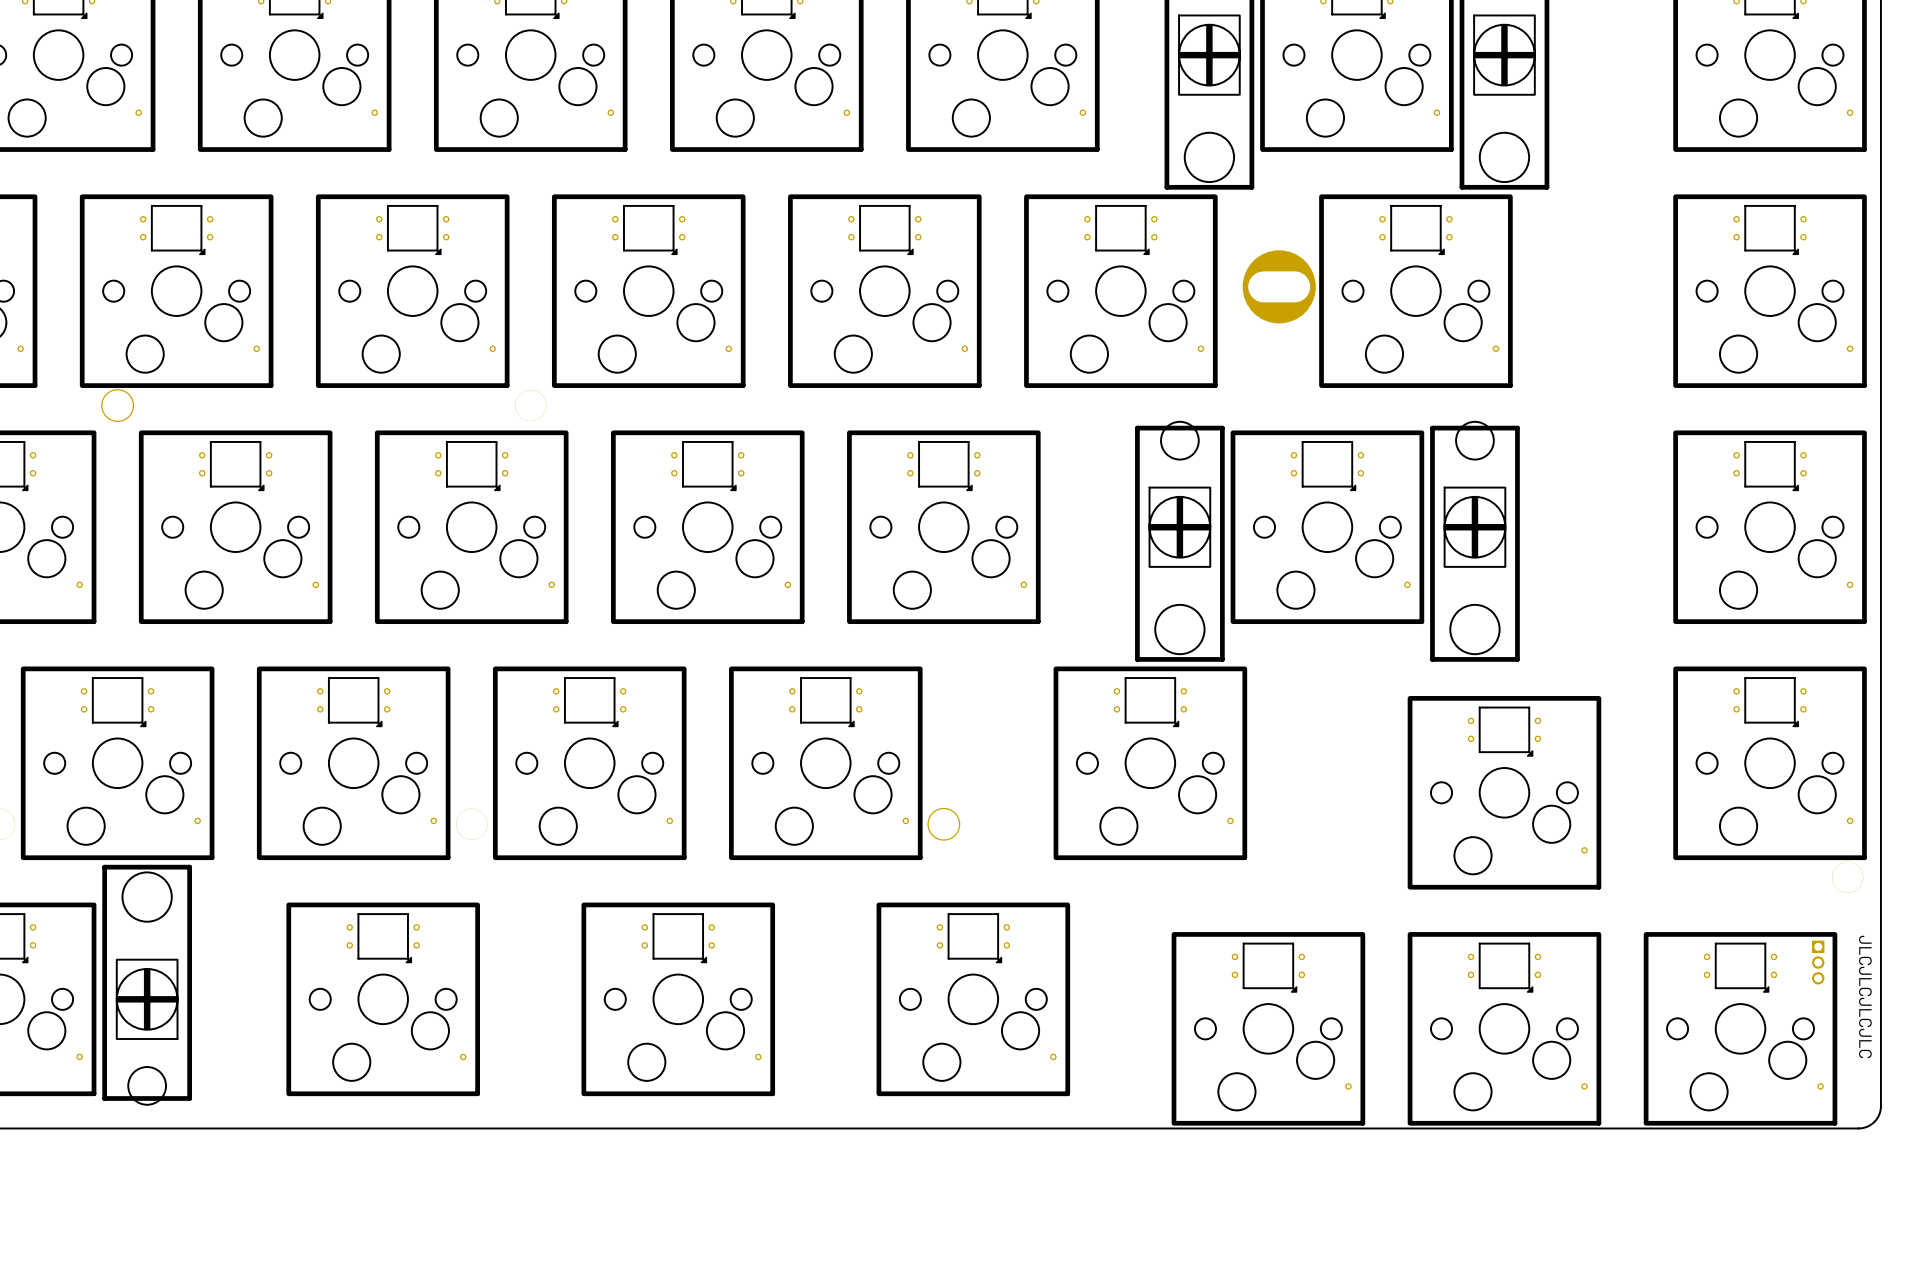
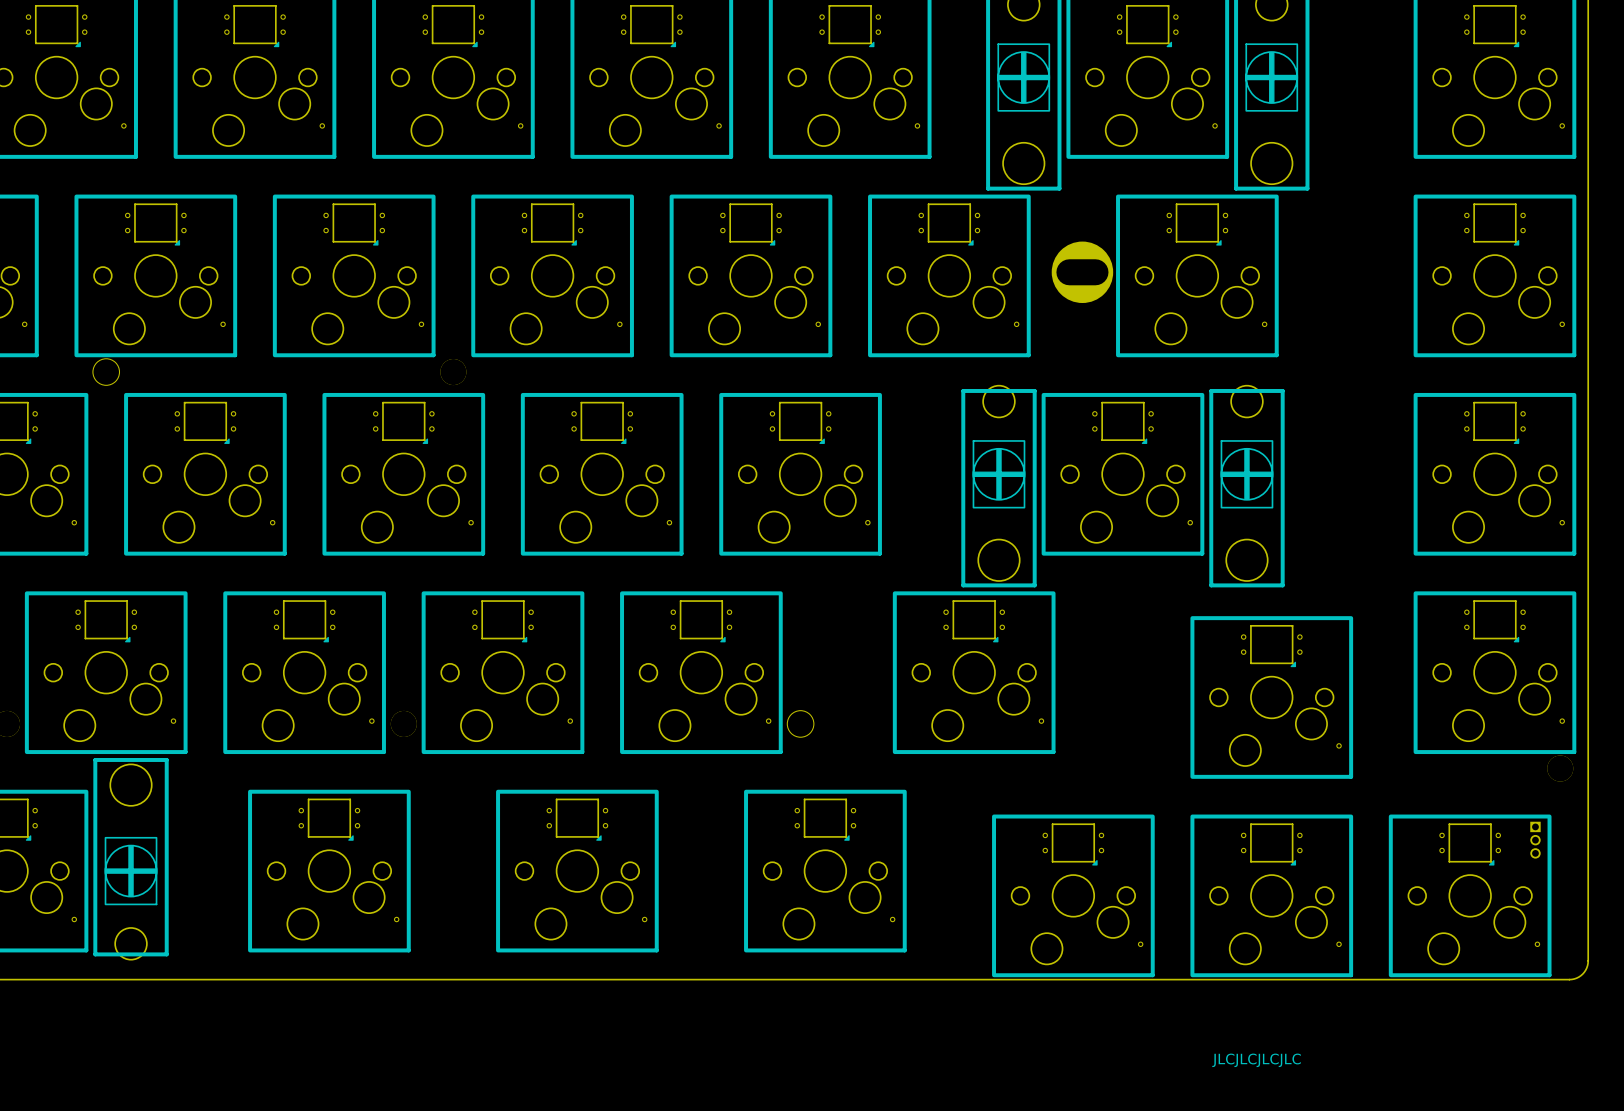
text: JLCJLCJLCJLC (1865, 996) -> none
text: none -> JLCJLCJLCJLC (1256, 1060)

